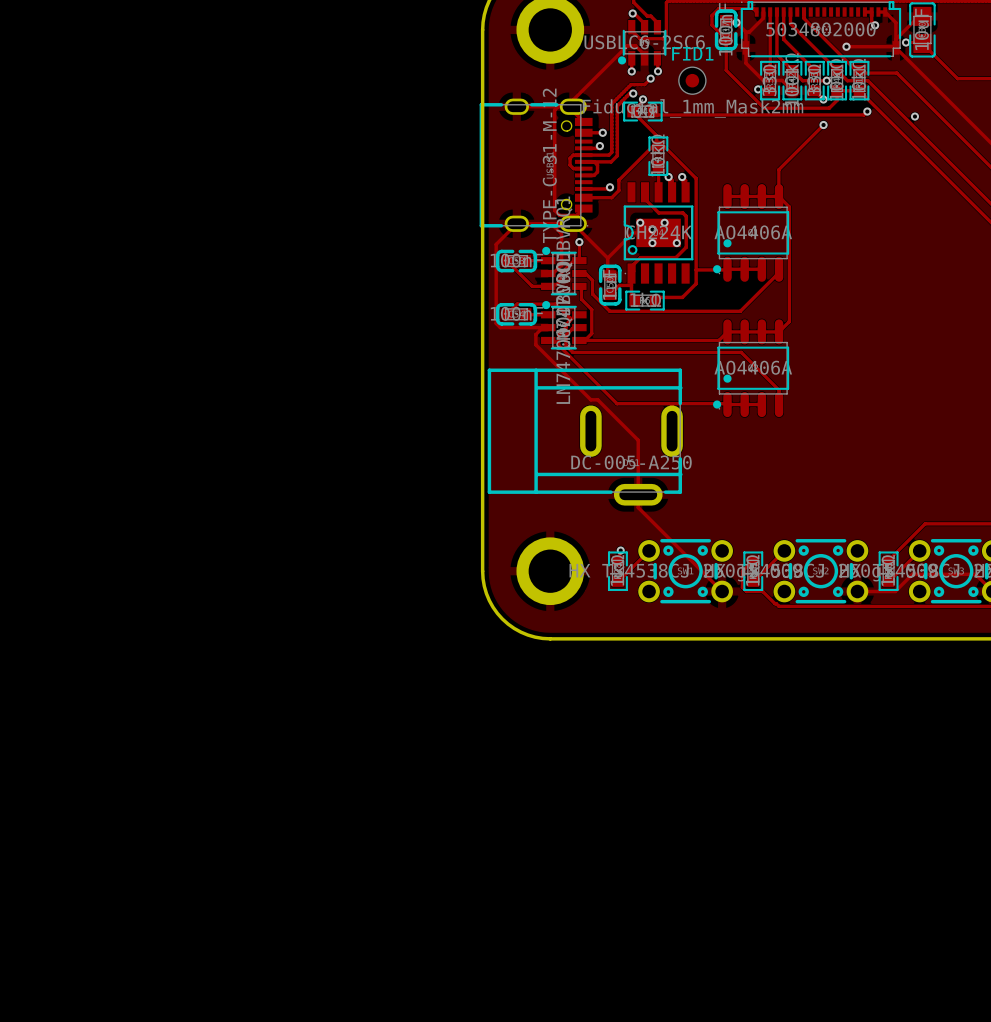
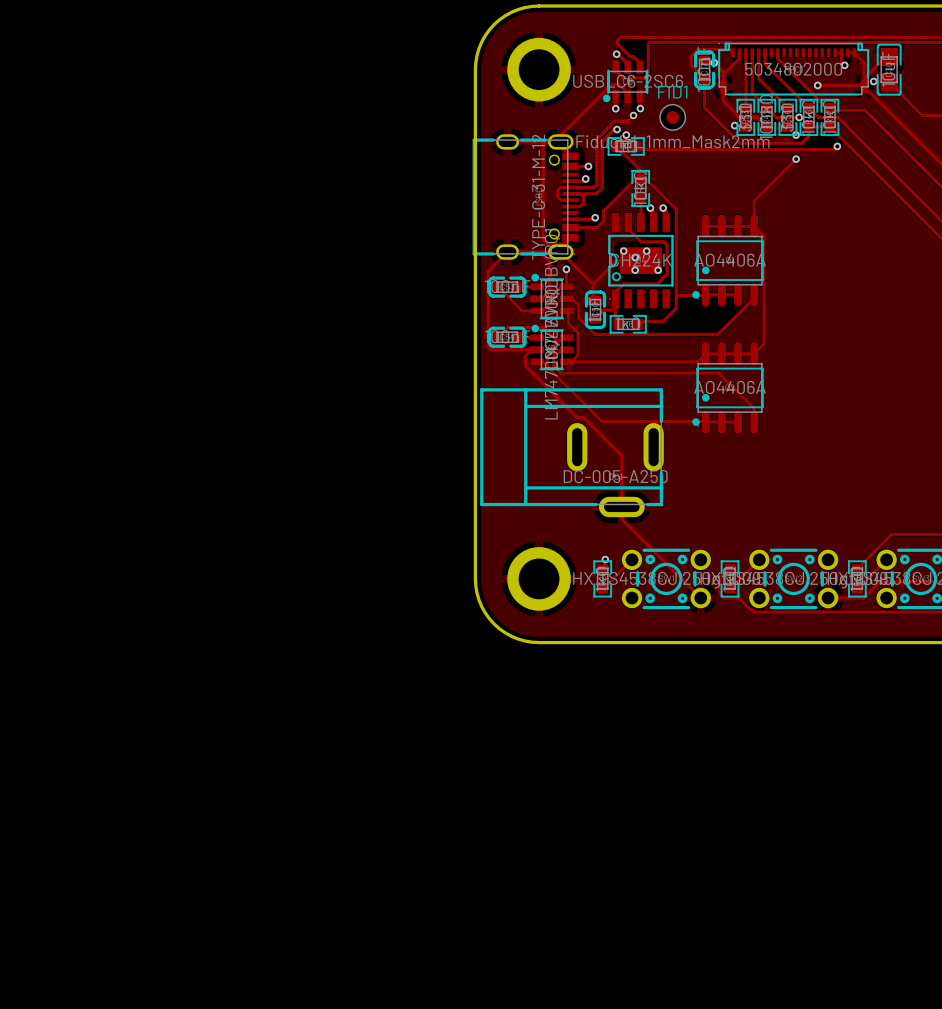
via: (914, 116) -> none

